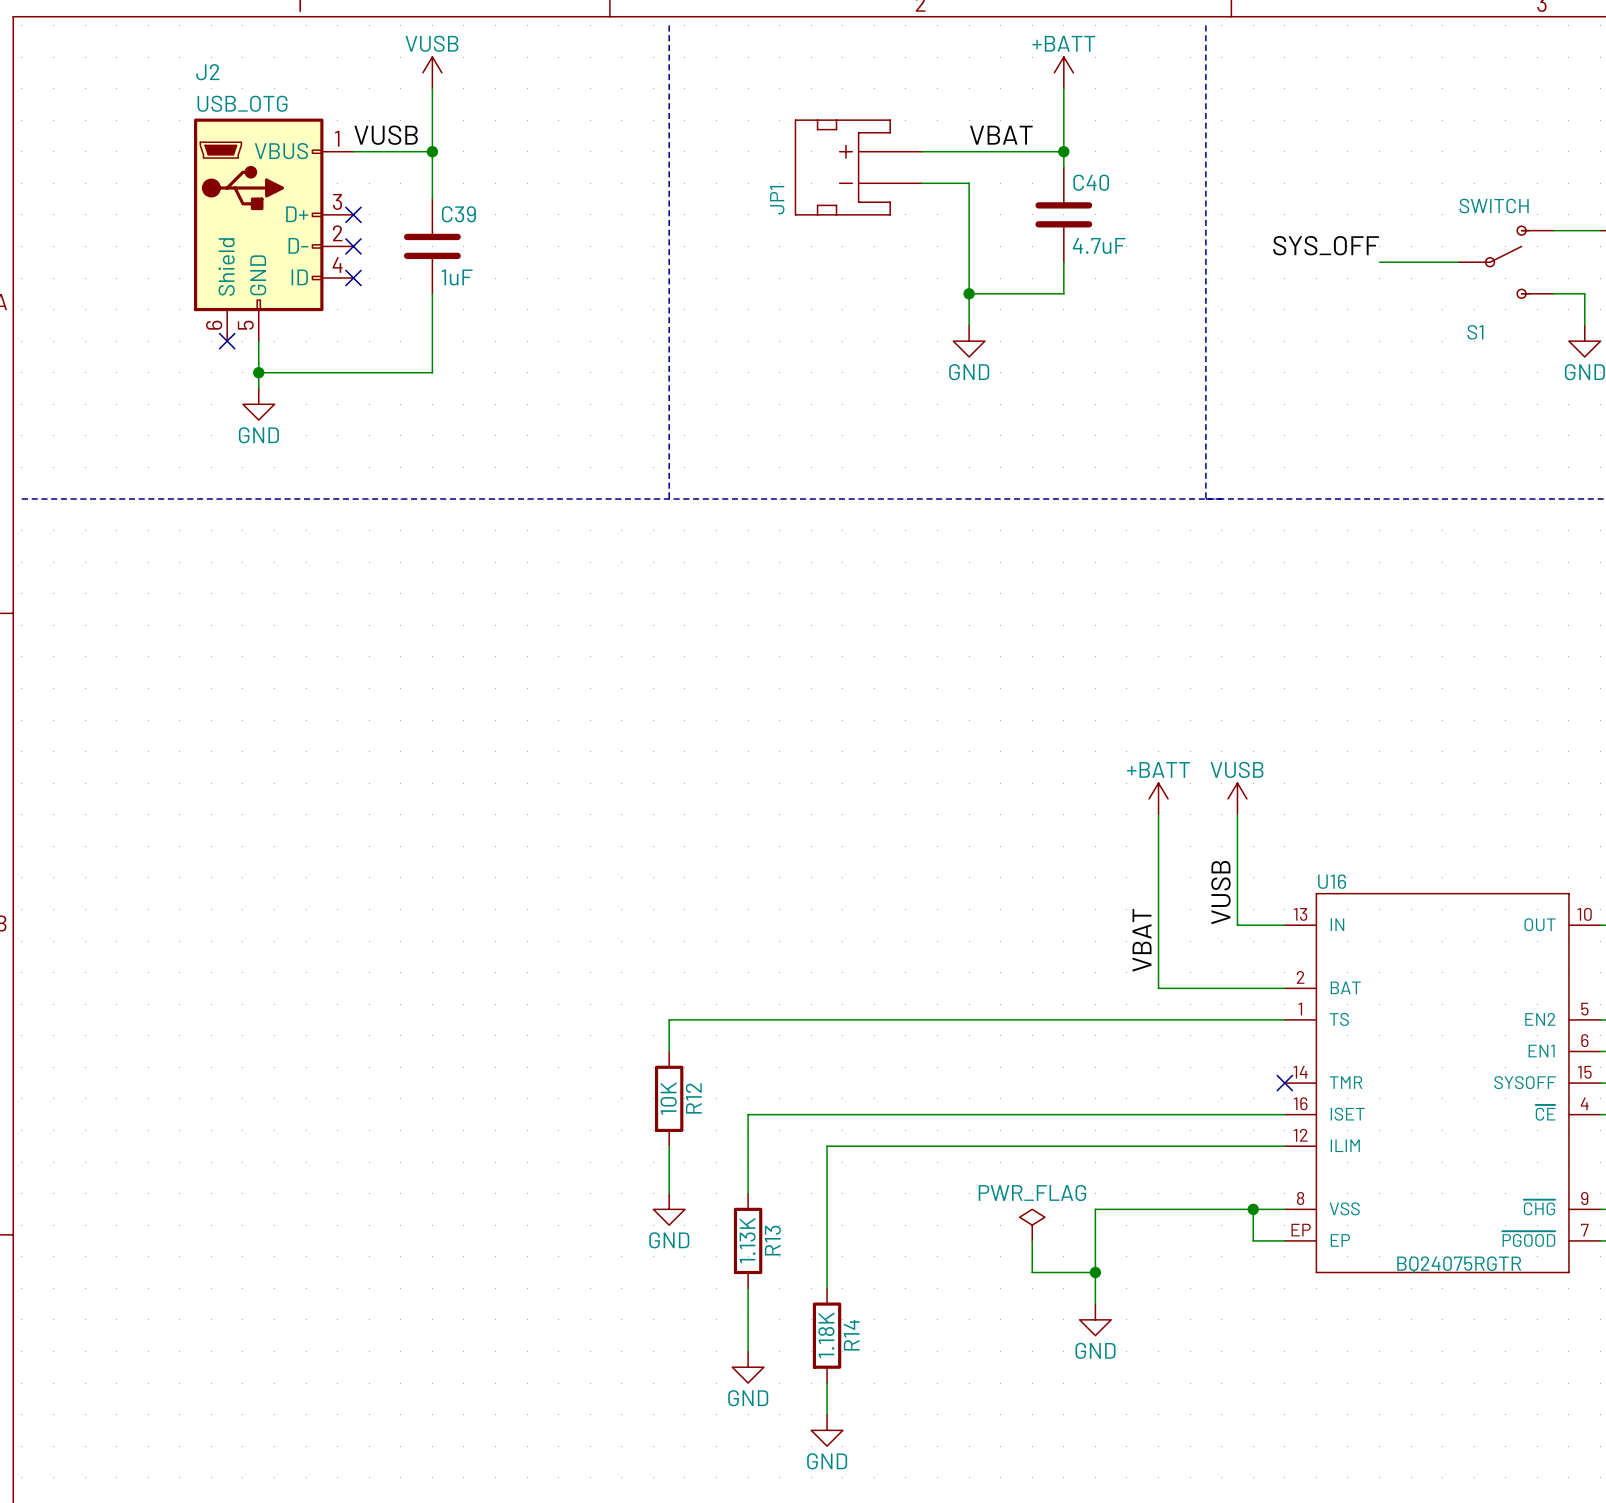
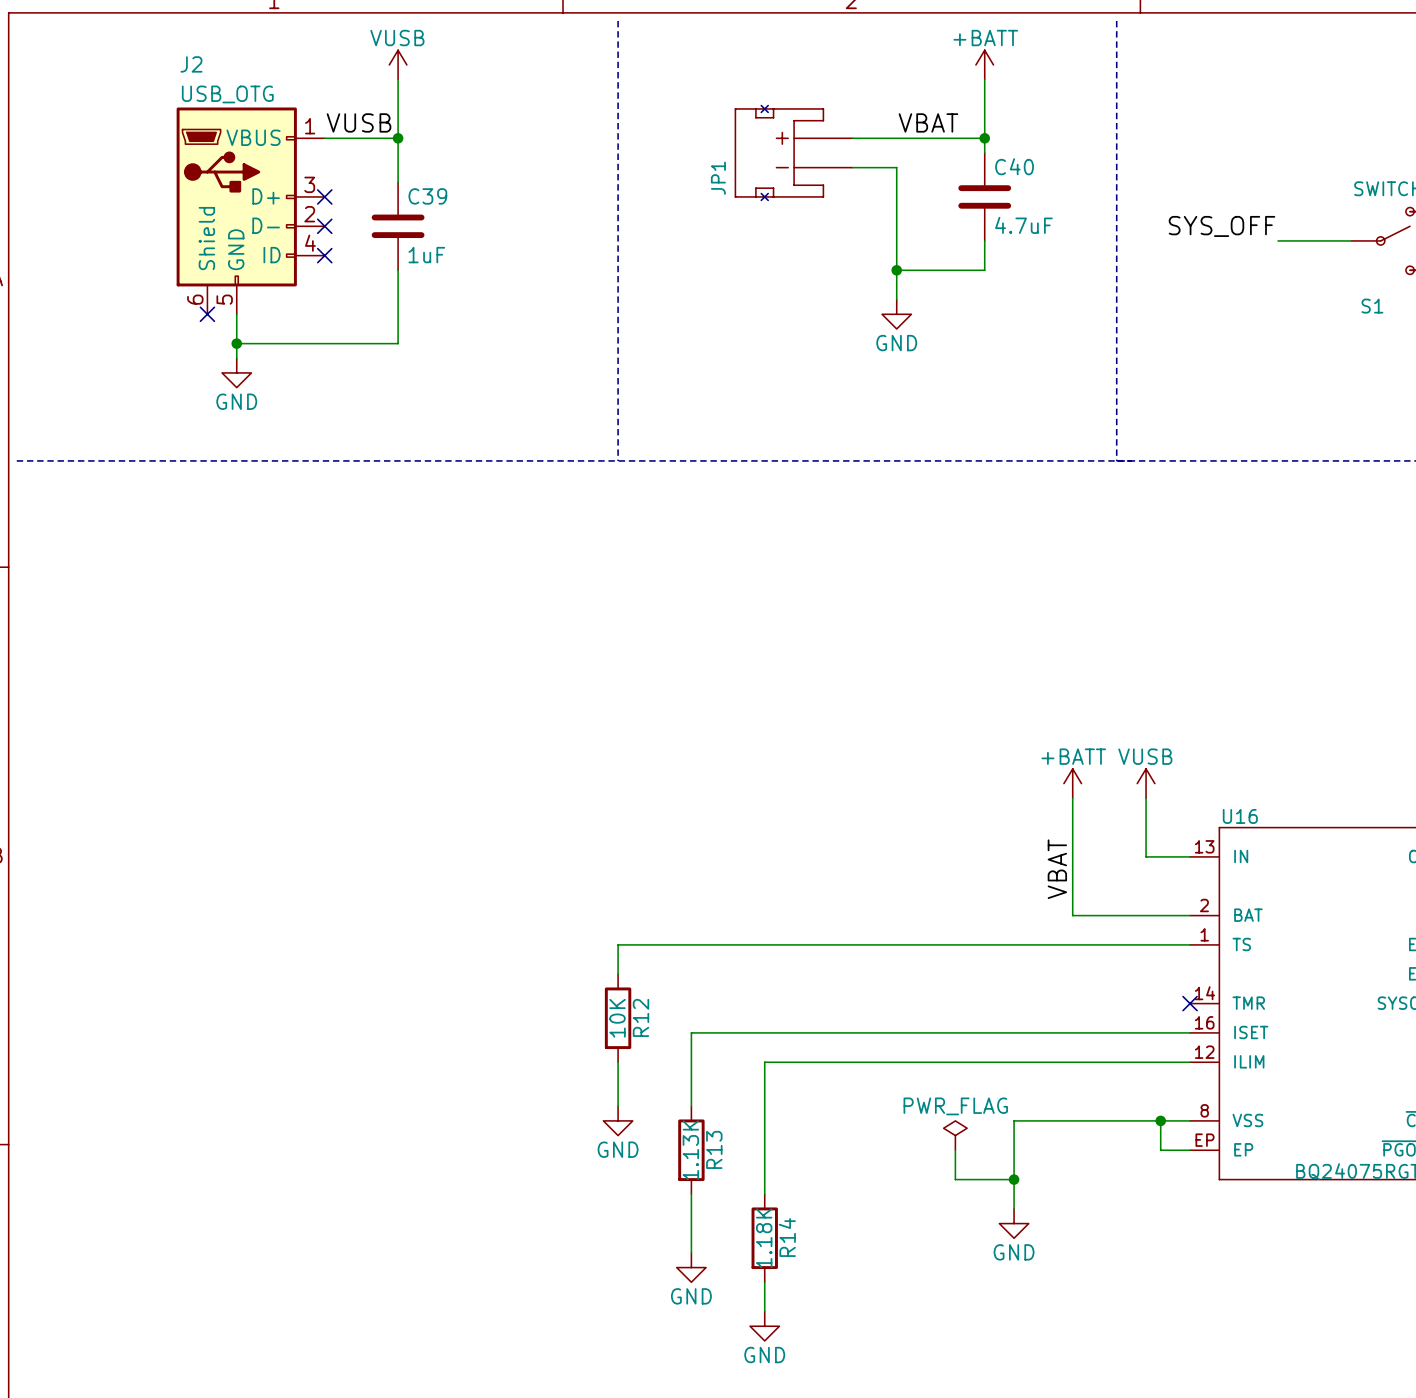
JP1 symbol: [795, 120, 922, 215] -> [735, 105, 853, 201]
power symbol position: +BATT (1158, 798) -> +BATT (1072, 783)
power symbol position: VUSB (1237, 798) -> VUSB (1146, 783)
label: VUSB (1220, 892) -> none

